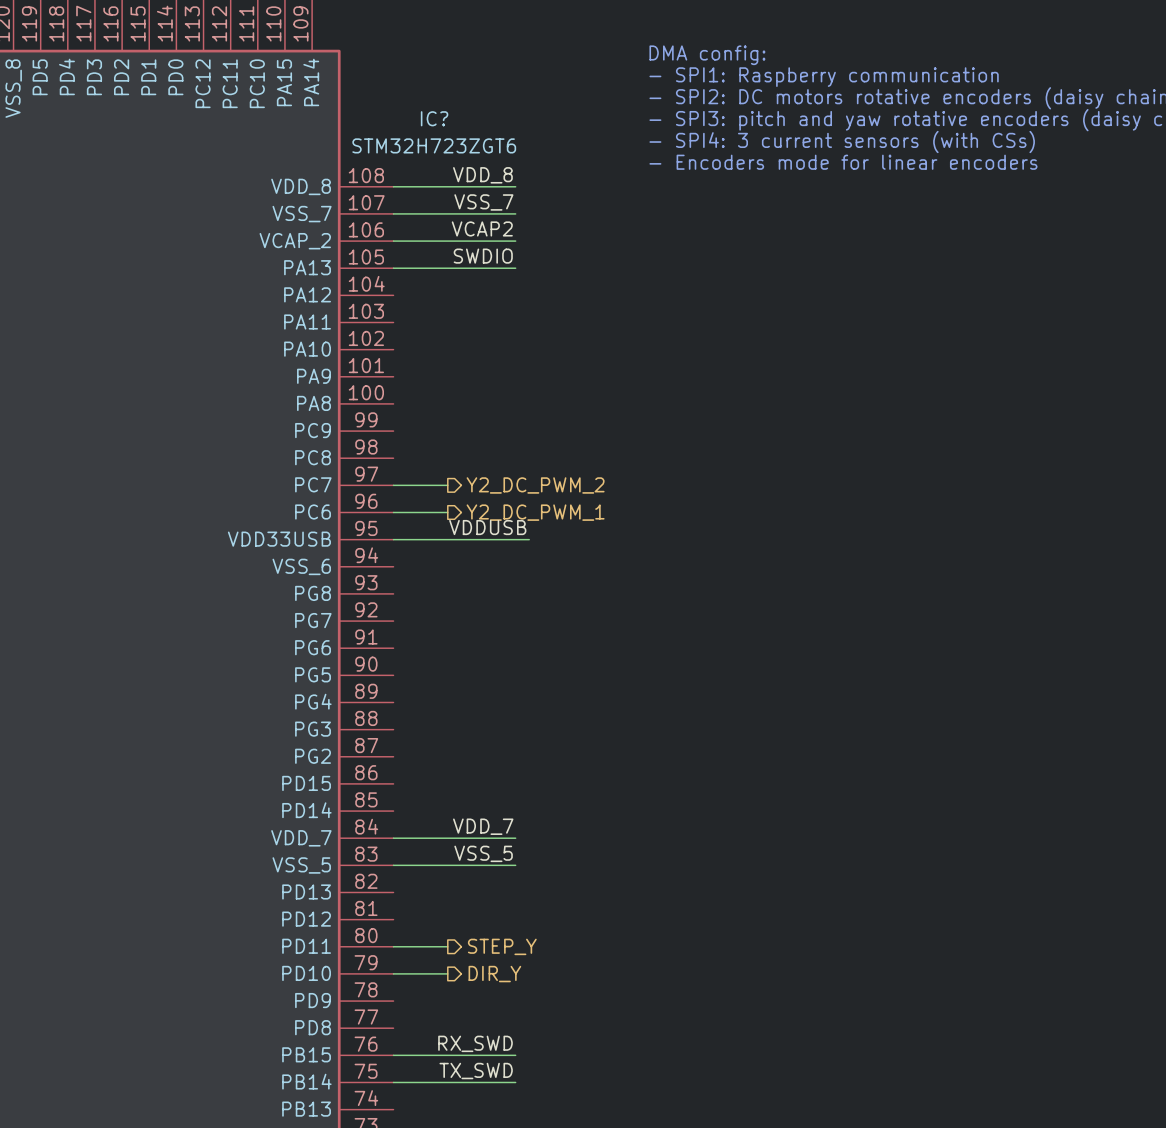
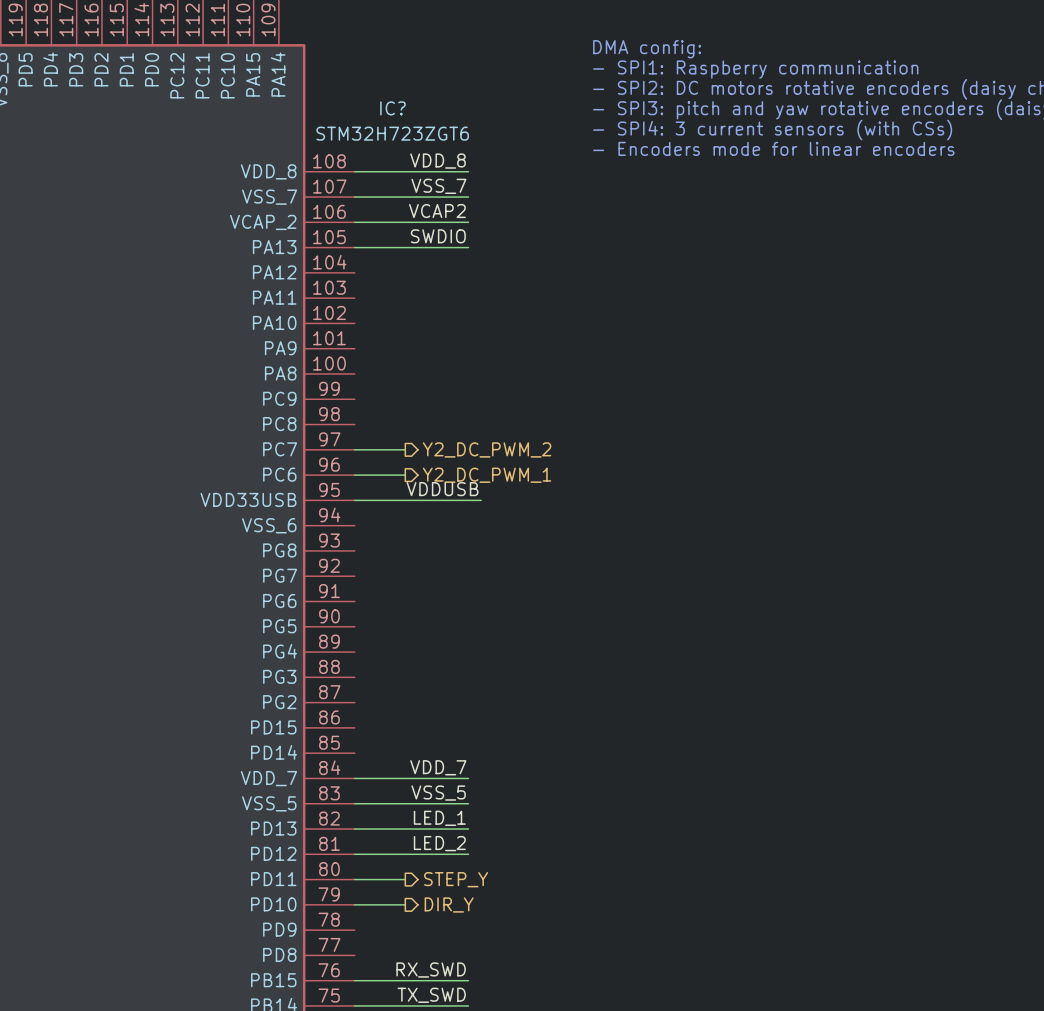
label: none -> LED_1 (439, 818)
wire: none -> (354, 829) (468, 829)
label: none -> LED_2 (439, 843)
wire: none -> (354, 854) (468, 854)

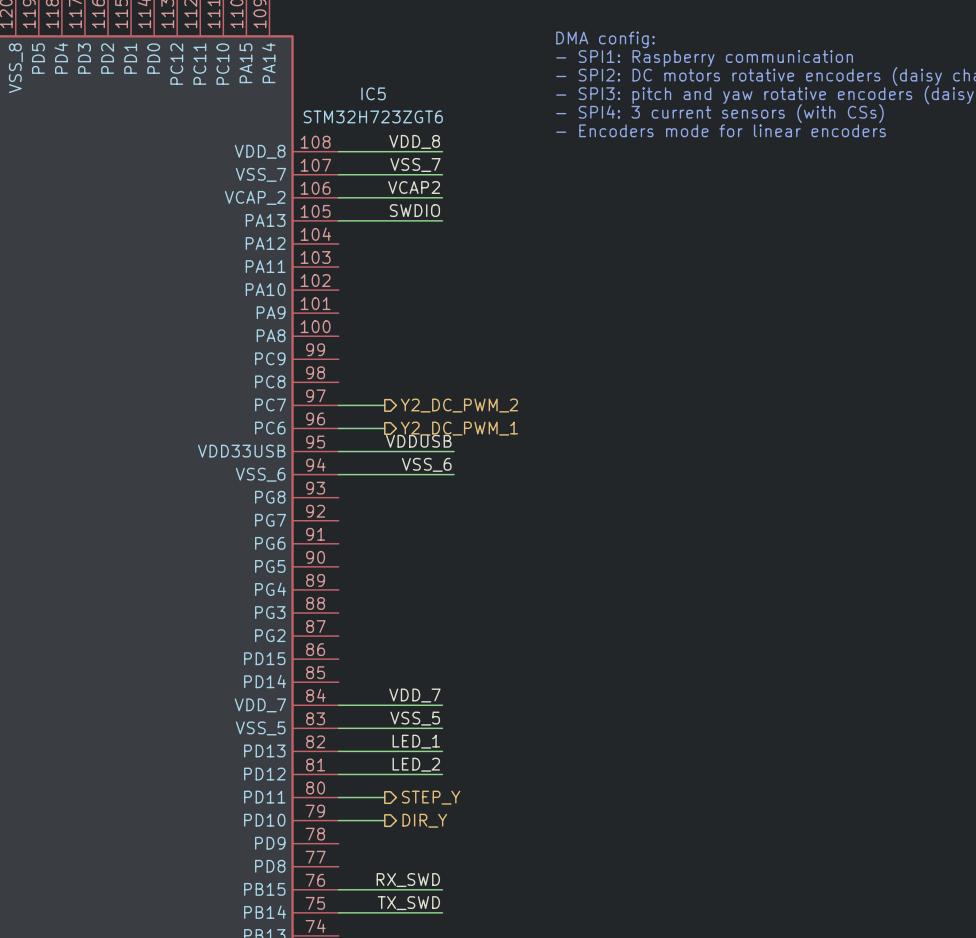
IC? name: IC? (392, 108) -> IC5 (373, 93)
label: none -> VSS_6 (426, 464)
wire: none -> (338, 474) (454, 474)

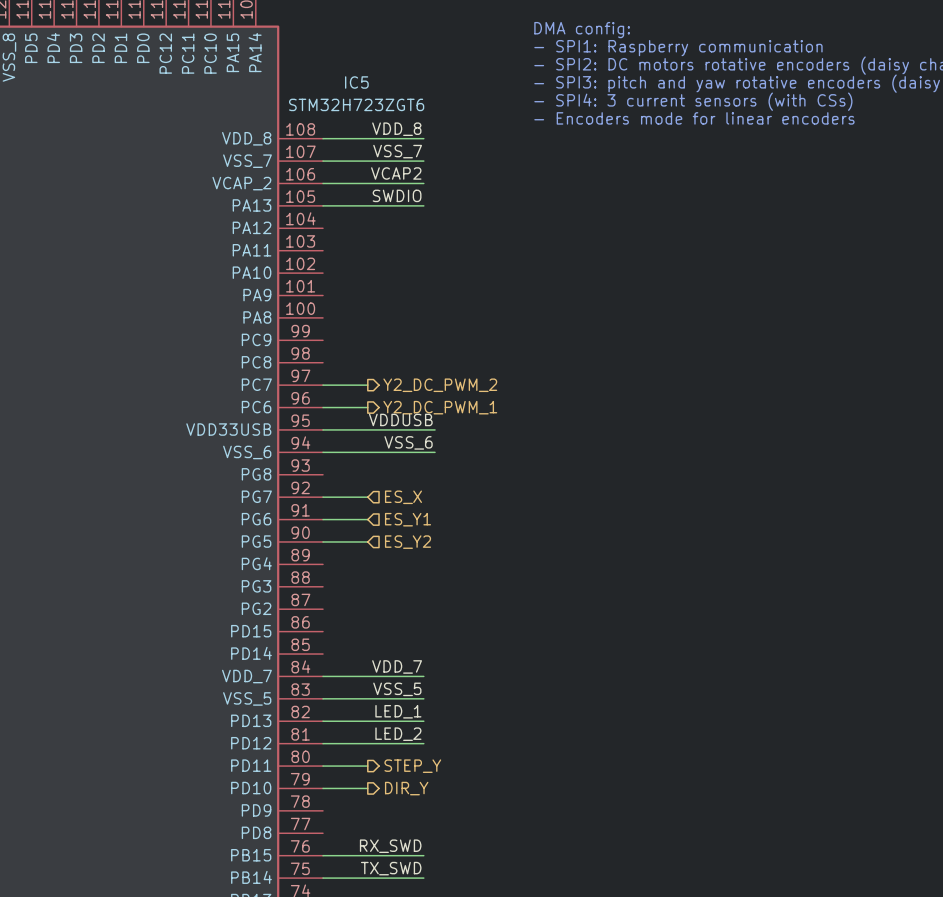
wire: none -> (323, 497) (367, 497)
hierarchical label: none -> ES_X (403, 497)
wire: none -> (323, 519) (367, 519)
hierarchical label: none -> ES_Y1 (408, 519)
wire: none -> (323, 541) (367, 541)
hierarchical label: none -> ES_Y2 (408, 542)

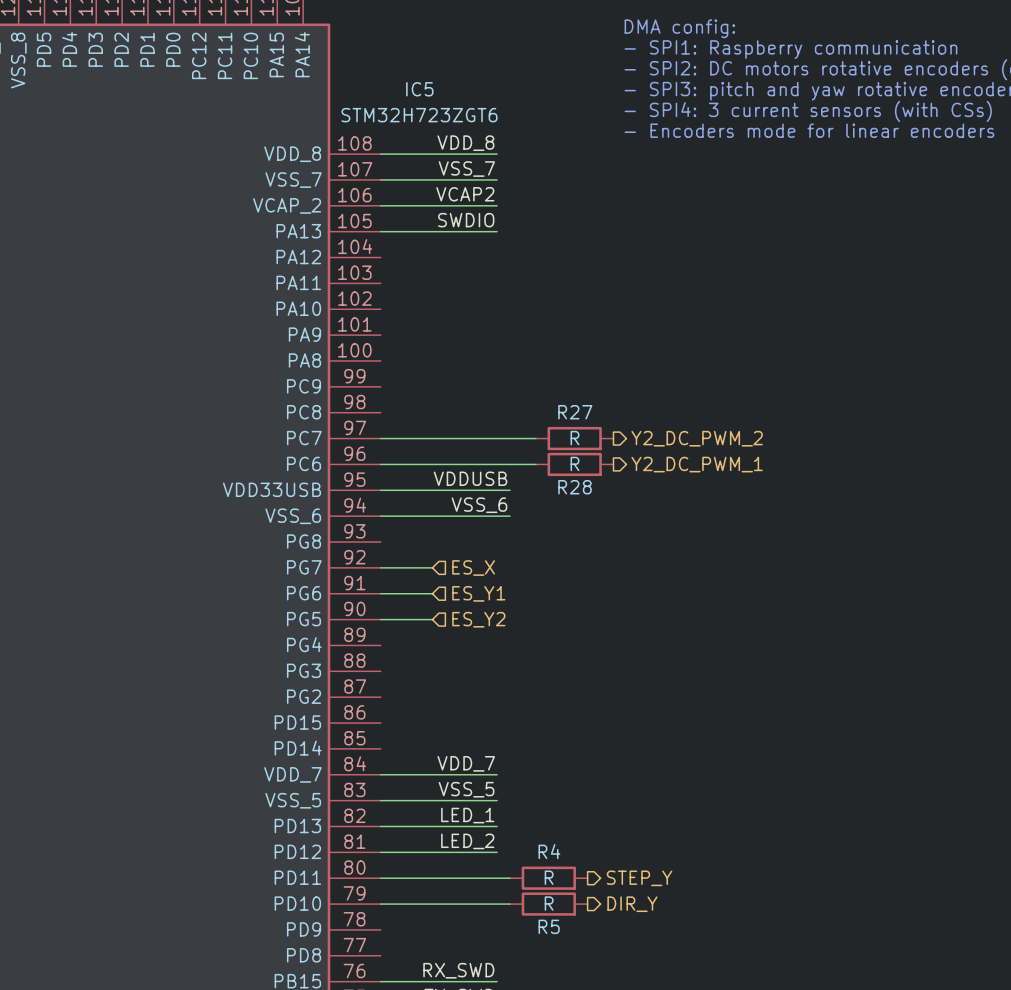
wire: none -> (432, 438) (535, 438)
hierarchical label position: Y2_DC_PWM_2 (440, 385) -> Y2_DC_PWM_2 (697, 438)
R27: none -> R (574, 438)
wire: none -> (432, 464) (535, 464)
hierarchical label position: Y2_DC_PWM_1 (440, 407) -> Y2_DC_PWM_1 (697, 464)
R28: none -> R (574, 464)
wire: none -> (432, 878) (510, 878)
hierarchical label position: STEP_Y (412, 766) -> STEP_Y (639, 878)
R4: none -> R (548, 878)
wire: none -> (432, 904) (510, 904)
hierarchical label position: DIR_Y (406, 788) -> DIR_Y (632, 904)
R5: none -> R (548, 904)

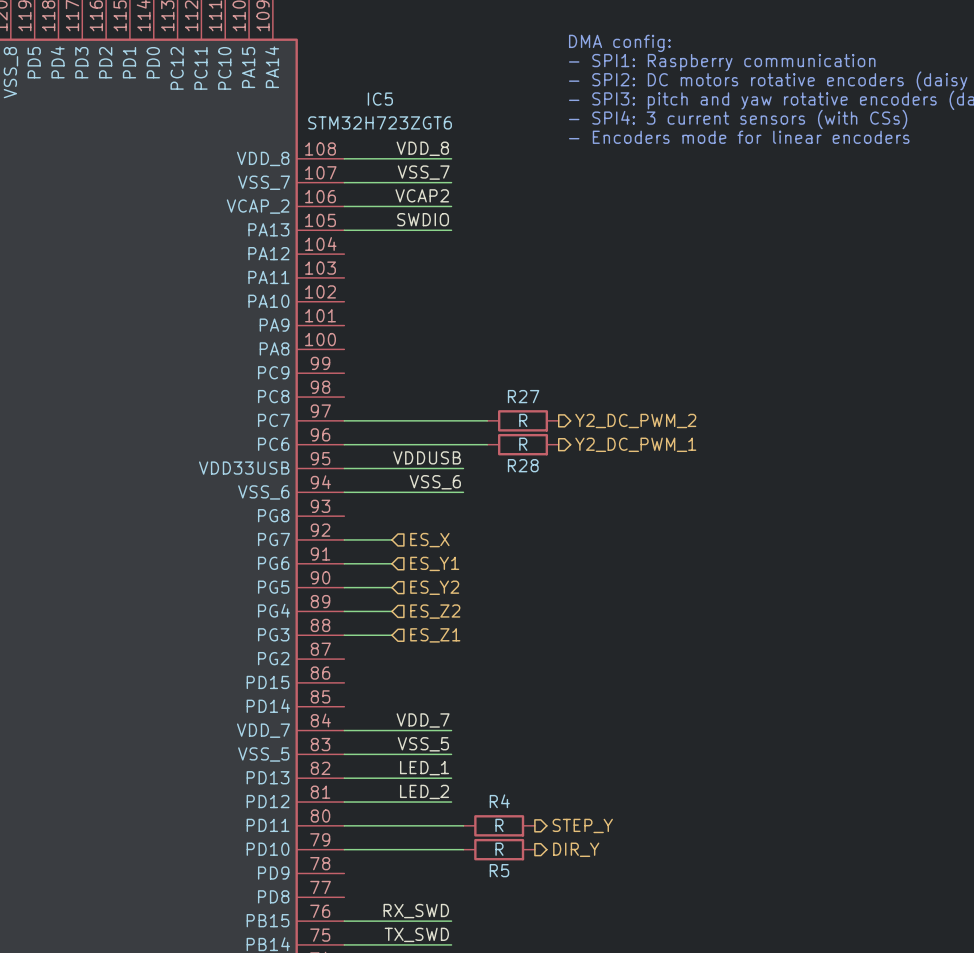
wire: none -> (344, 611) (391, 611)
hierarchical label: none -> ES_Z2 (435, 611)
wire: none -> (344, 635) (391, 635)
hierarchical label: none -> ES_Z1 (435, 635)

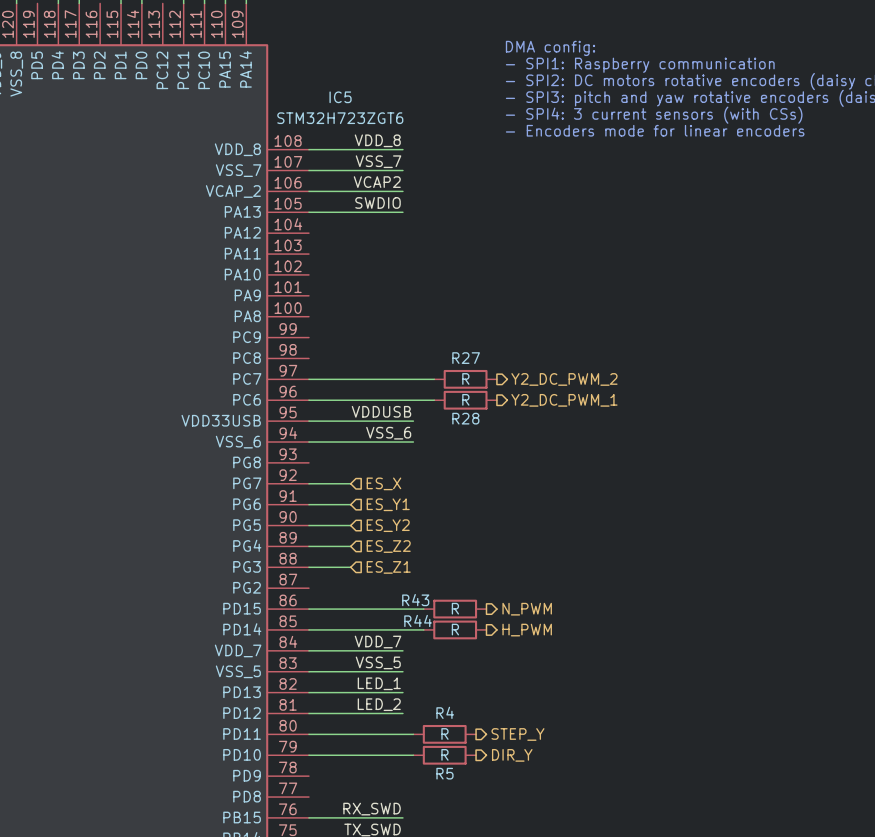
wire: none -> (308, 609) (423, 609)
R43: none -> R (455, 609)
hierarchical label: none -> N_PWM (527, 609)
wire: none -> (308, 629) (423, 629)
R44: none -> R (455, 629)
hierarchical label: none -> H_PWM (527, 630)

